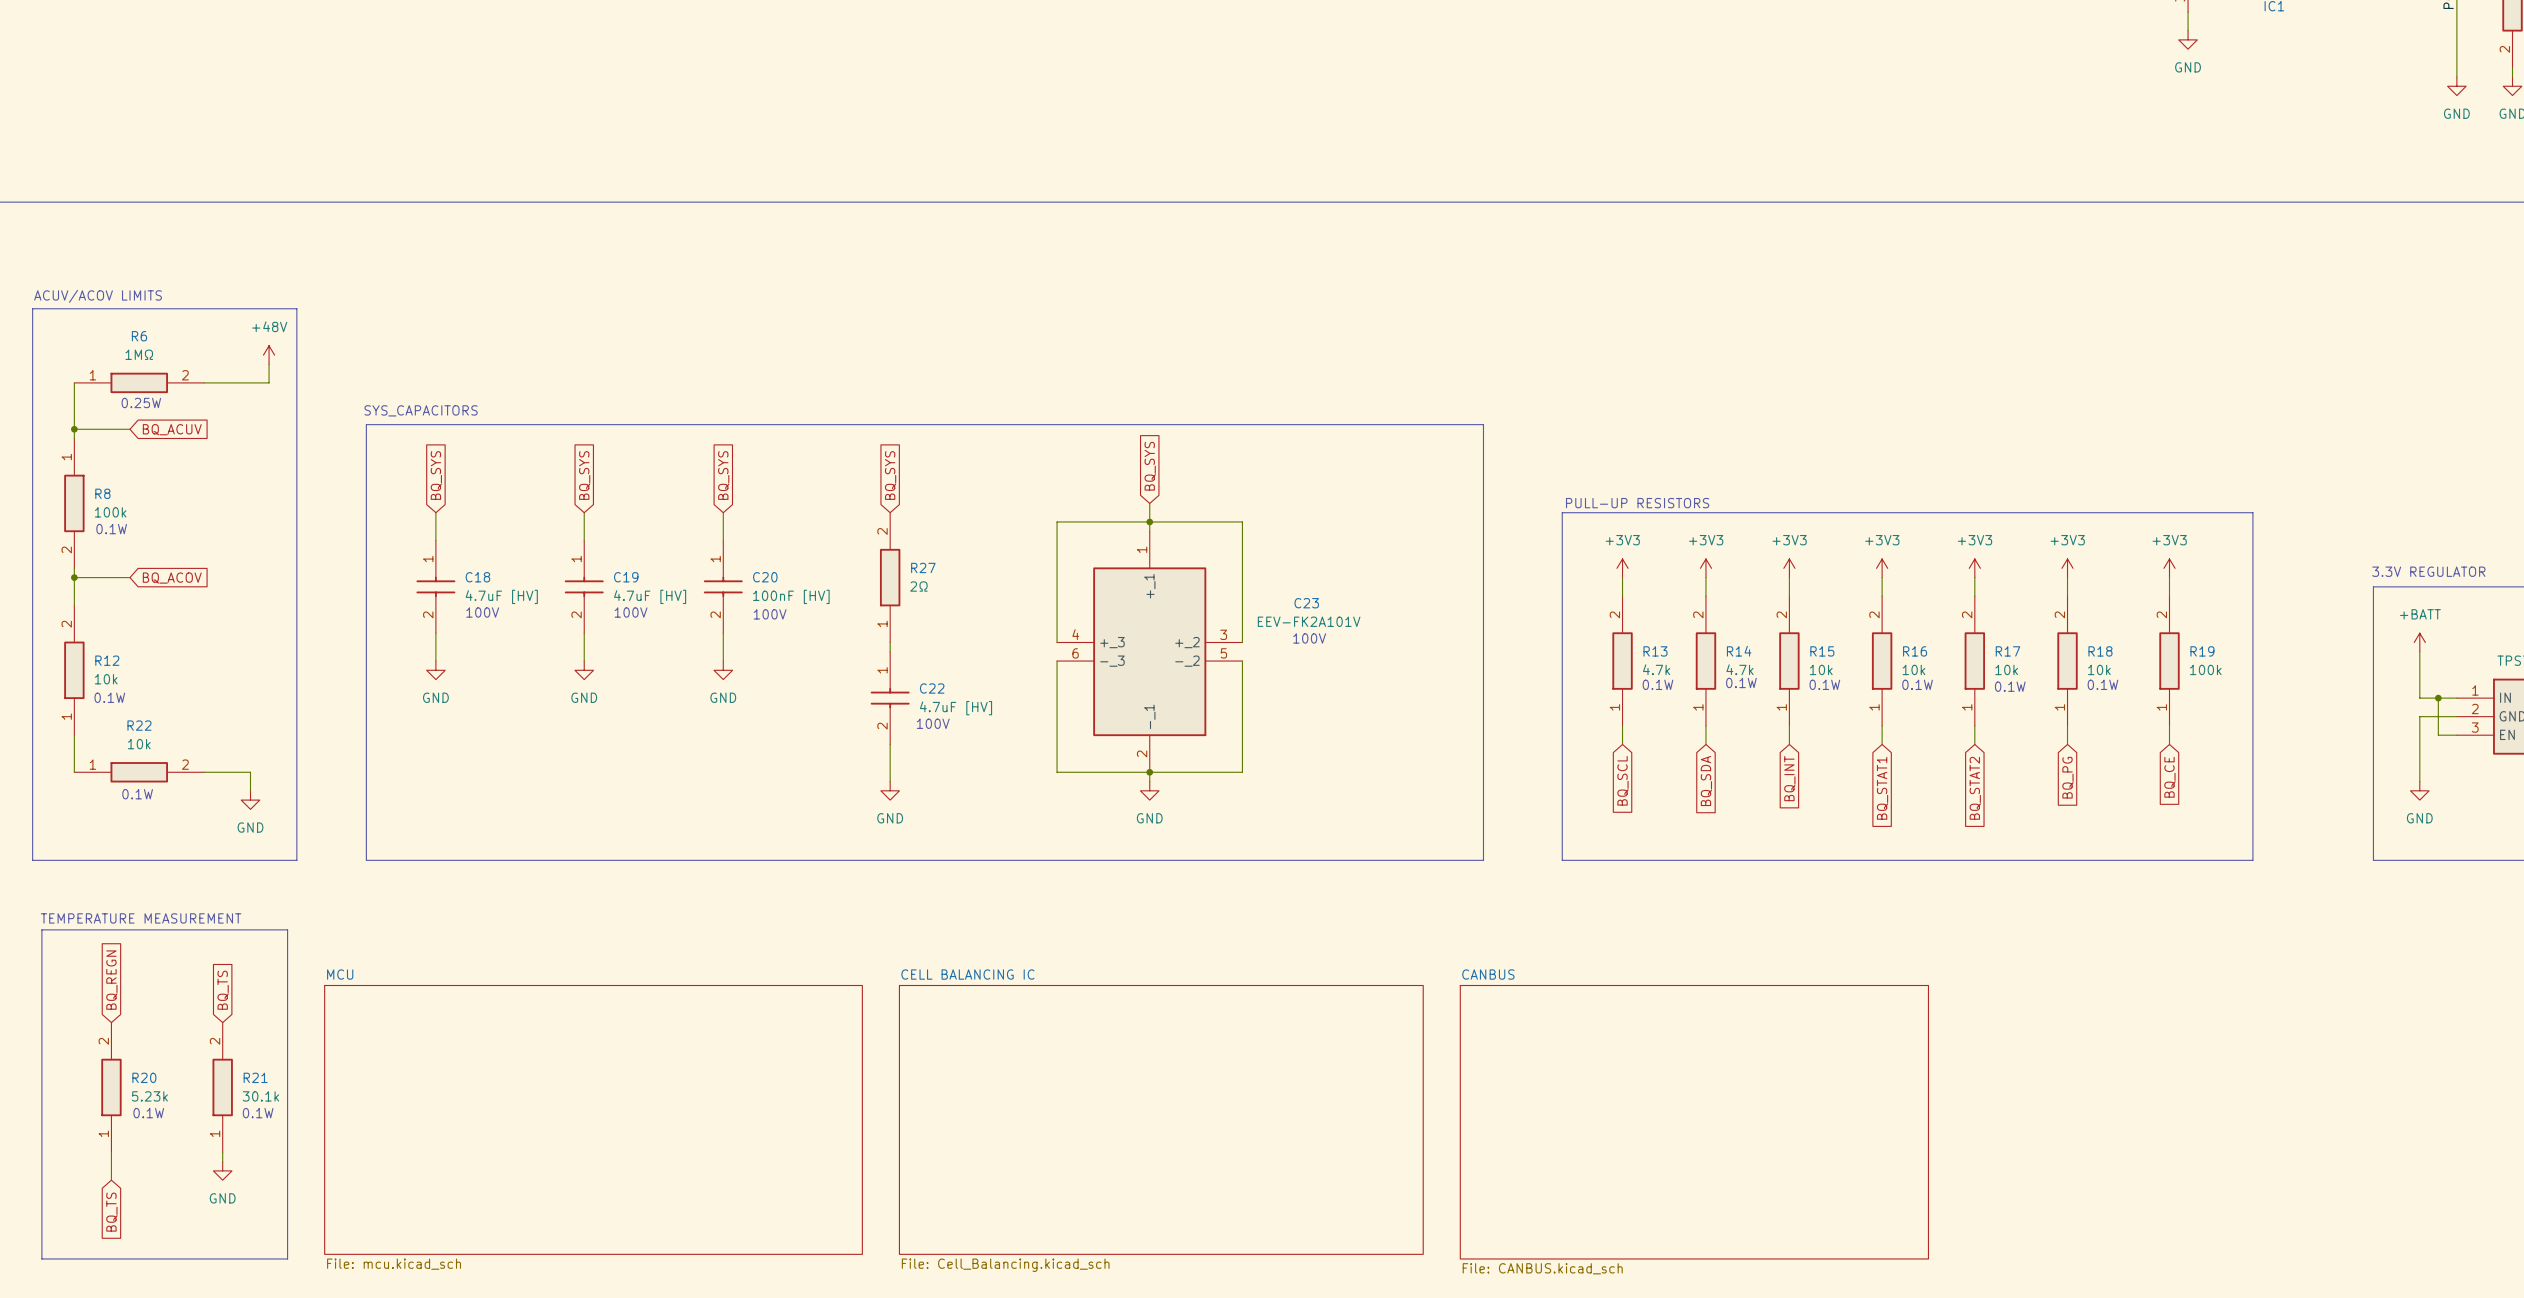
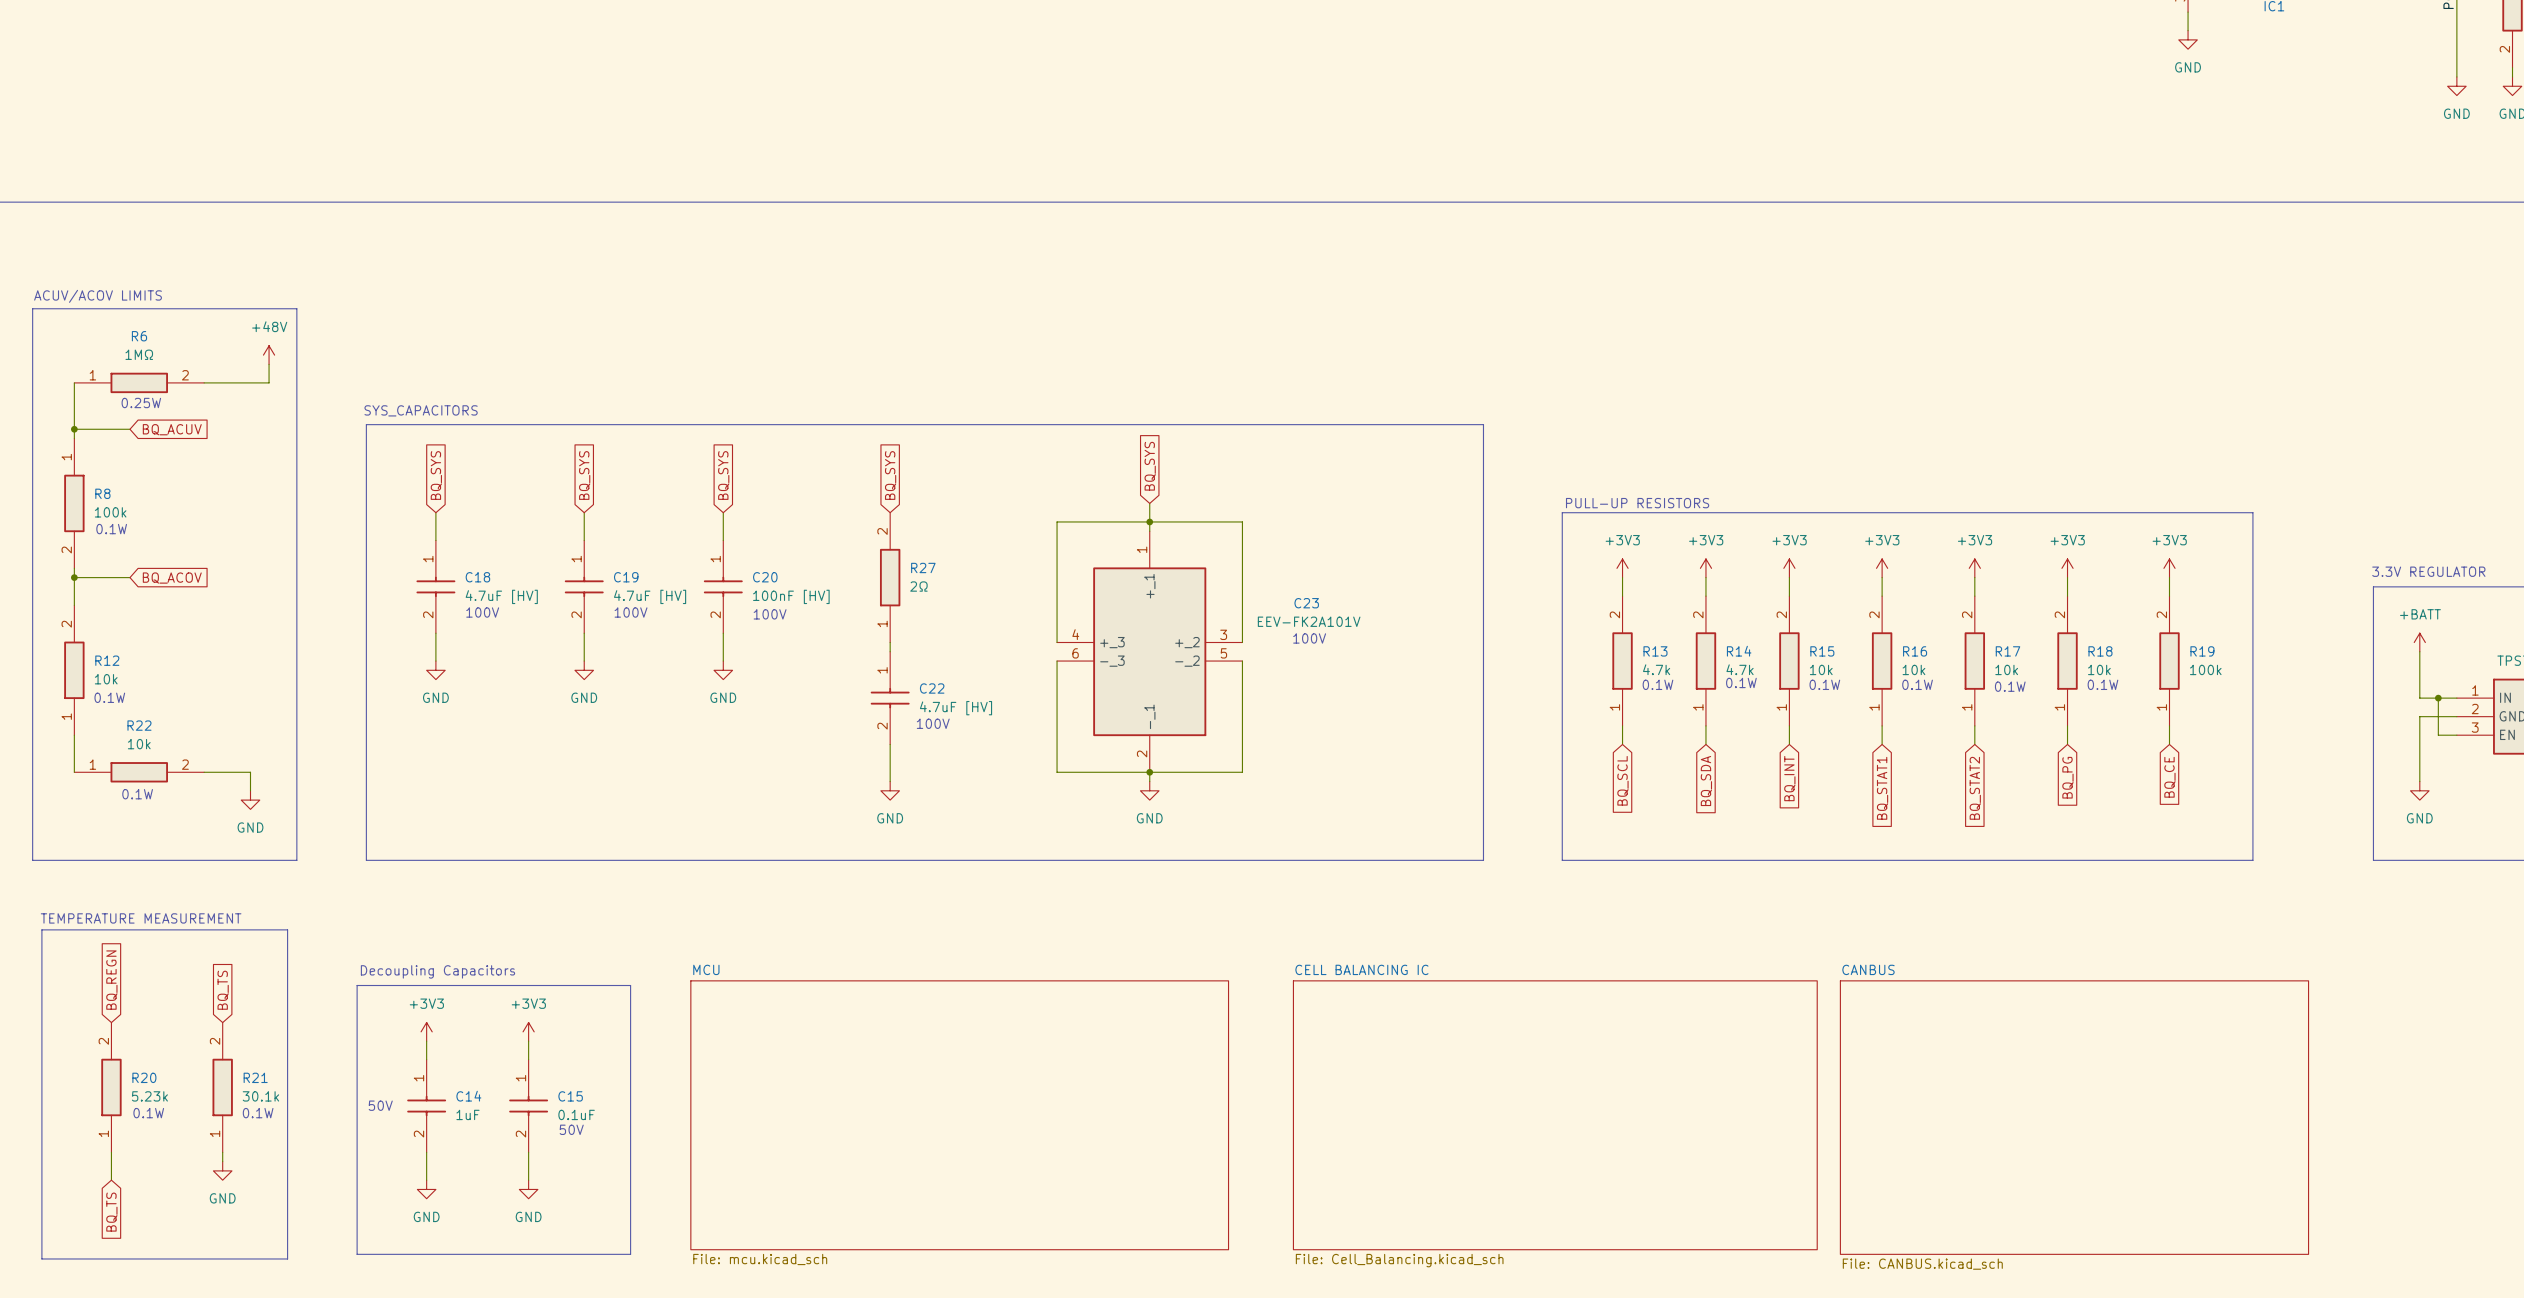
text: none -> Decoupling Capacitors (437, 971)
line: none -> (357, 985) (630, 985) (630, 1254) (357, 1254) (357, 985)
power symbol: none -> +3V3 (426, 1031)
power symbol: none -> +3V3 (528, 1031)
wire: none -> (426, 1041) (426, 1059)
wire: none -> (528, 1041) (528, 1059)
text: none -> 50V (380, 1105)
C14: none -> 1uF (426, 1106)
C15: none -> 0.1uF (528, 1106)
sheet MCU: none -> File: mcu.kicad_sch (959, 1115)
sheet CELL BALANCING IC: none -> File: Cell_Balancing.kicad_sch (1555, 1115)
sheet CANBUS: none -> File: CANBUS.kicad_sch (2074, 1117)
sheet MCU: File: mcu.kicad_sch (593, 1119) -> none
sheet CELL BALANCING IC: File: Cell_Balancing.kicad_sch (1161, 1119) -> none
sheet CANBUS: File: CANBUS.kicad_sch (1694, 1122) -> none
text: none -> 50V (571, 1129)
wire: none -> (426, 1152) (426, 1180)
wire: none -> (528, 1152) (528, 1180)
power symbol: none -> GND (426, 1189)
power symbol: none -> GND (528, 1189)

